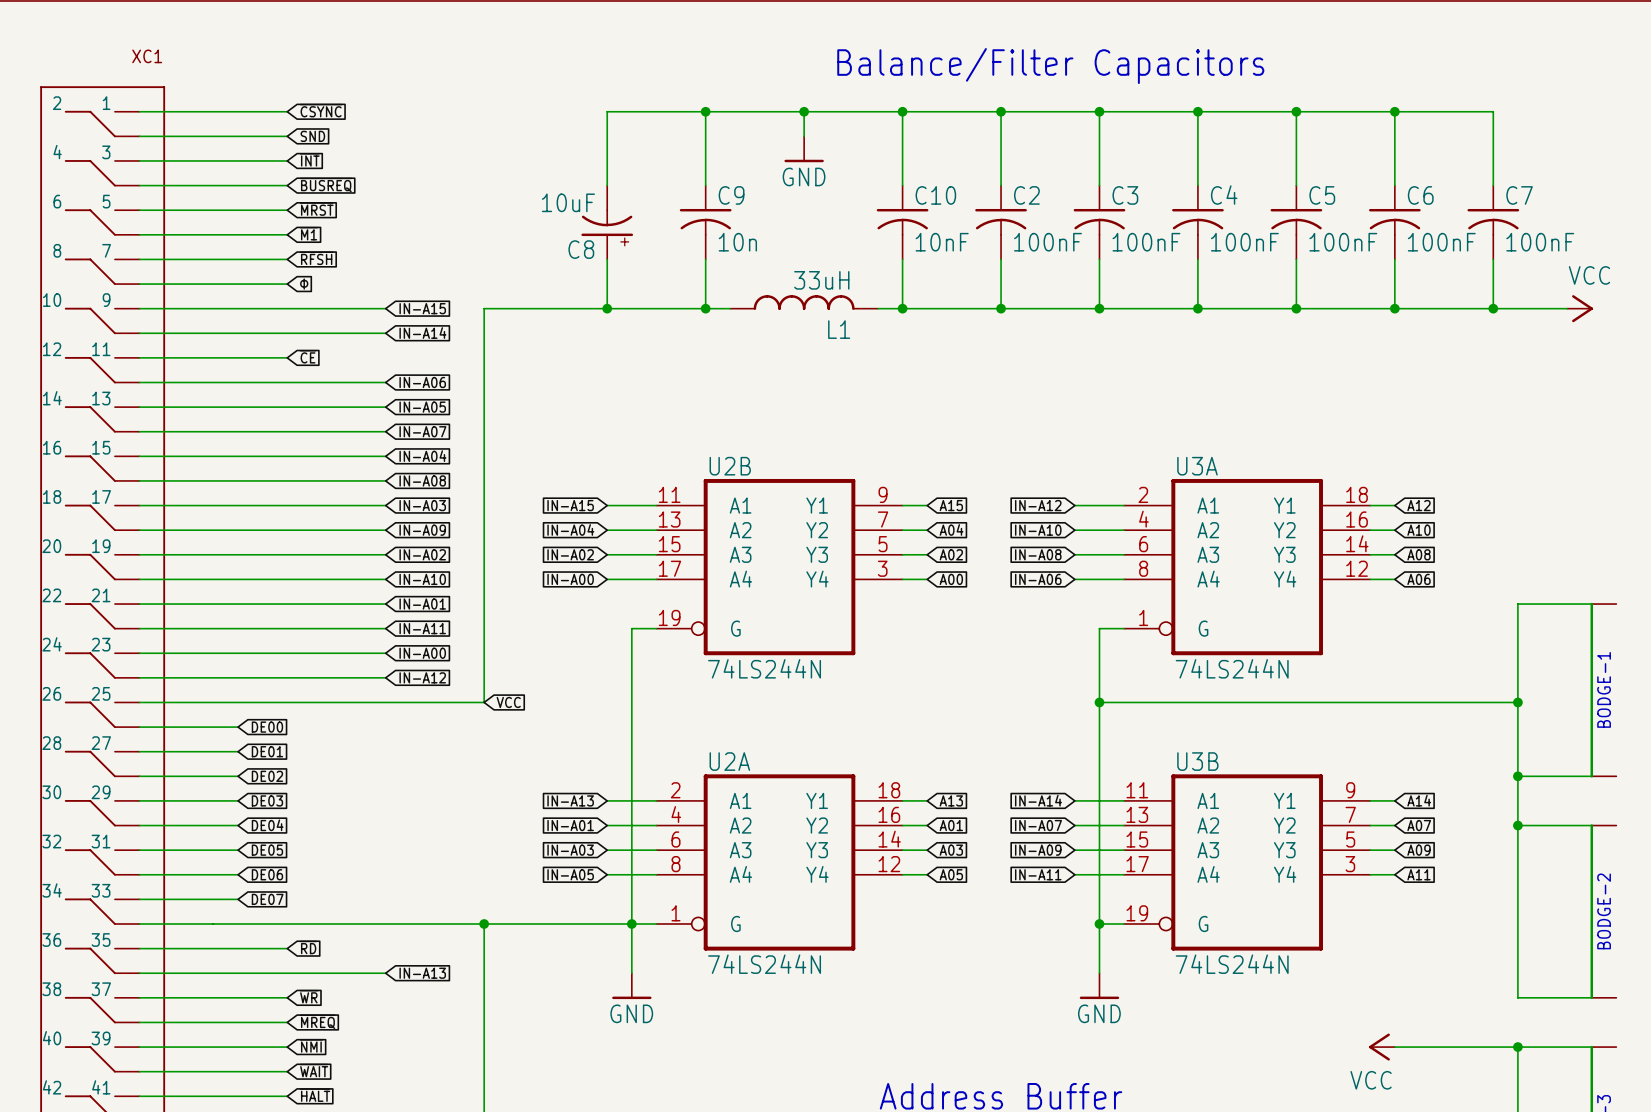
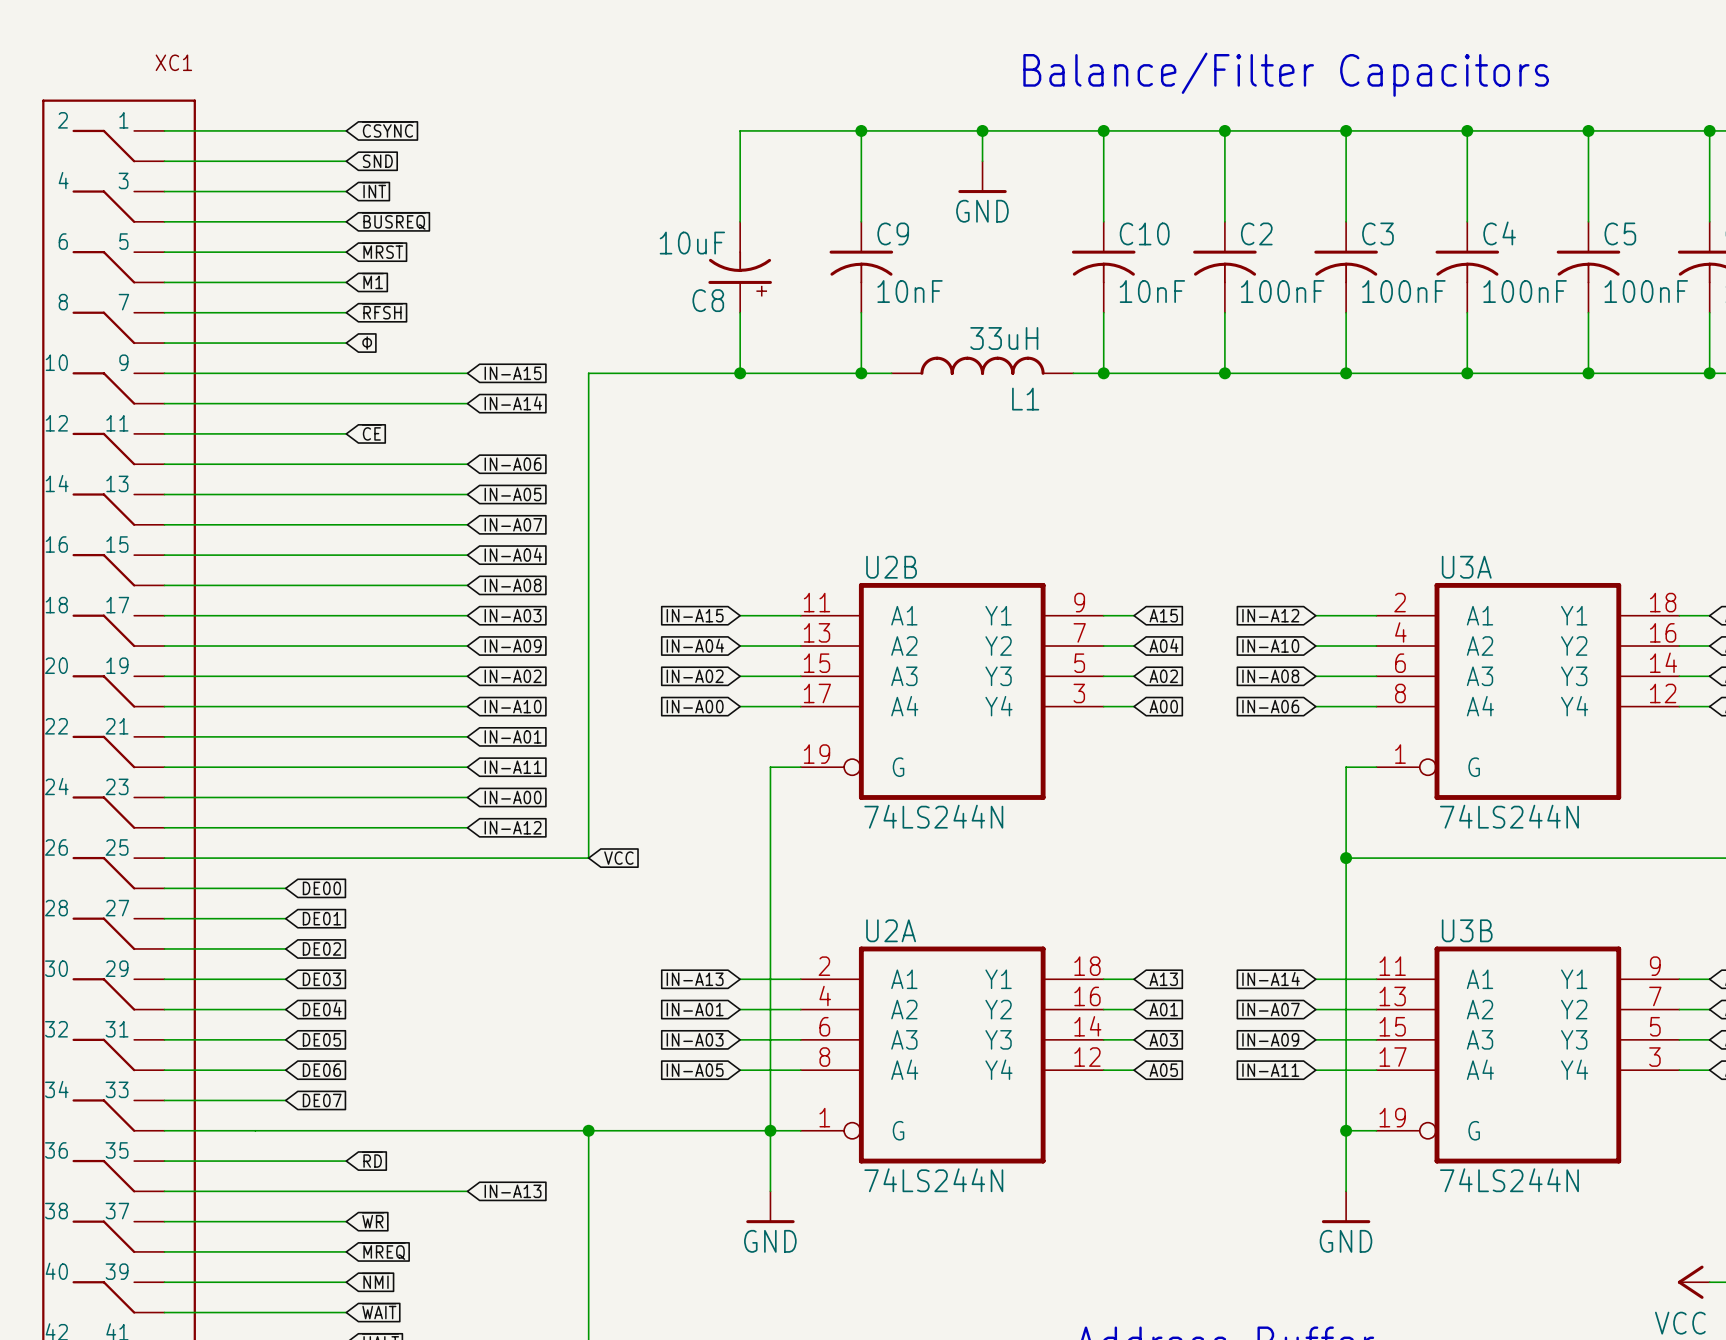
C9 value: 10n (737, 242) -> 10nF (910, 291)

